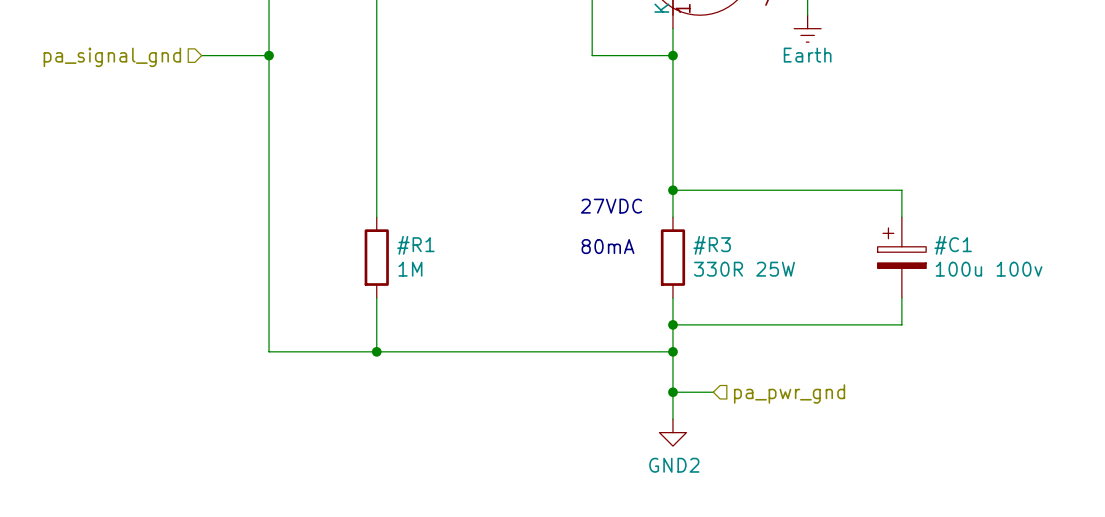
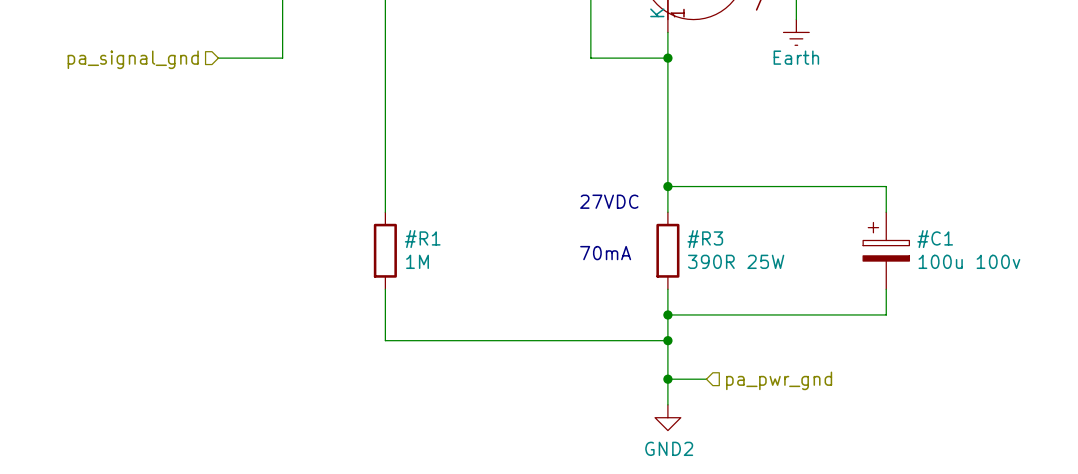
wire: (269, 55) (269, 351) (376, 351) -> none
junction: (269, 55) -> none
text: 80mA (608, 246) -> 70mA (605, 253)
power symbol: 330R 25W (672, 257) -> 390R 25W (667, 250)
junction: (376, 351) -> none

